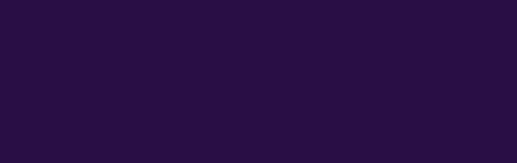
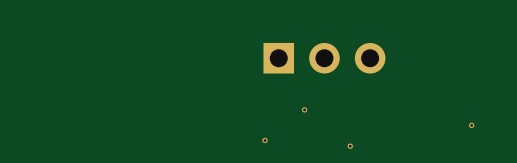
part: none -> (324, 58)
via: none -> (304, 109)
via: none -> (471, 125)
via: none -> (265, 140)
via: none -> (350, 146)

